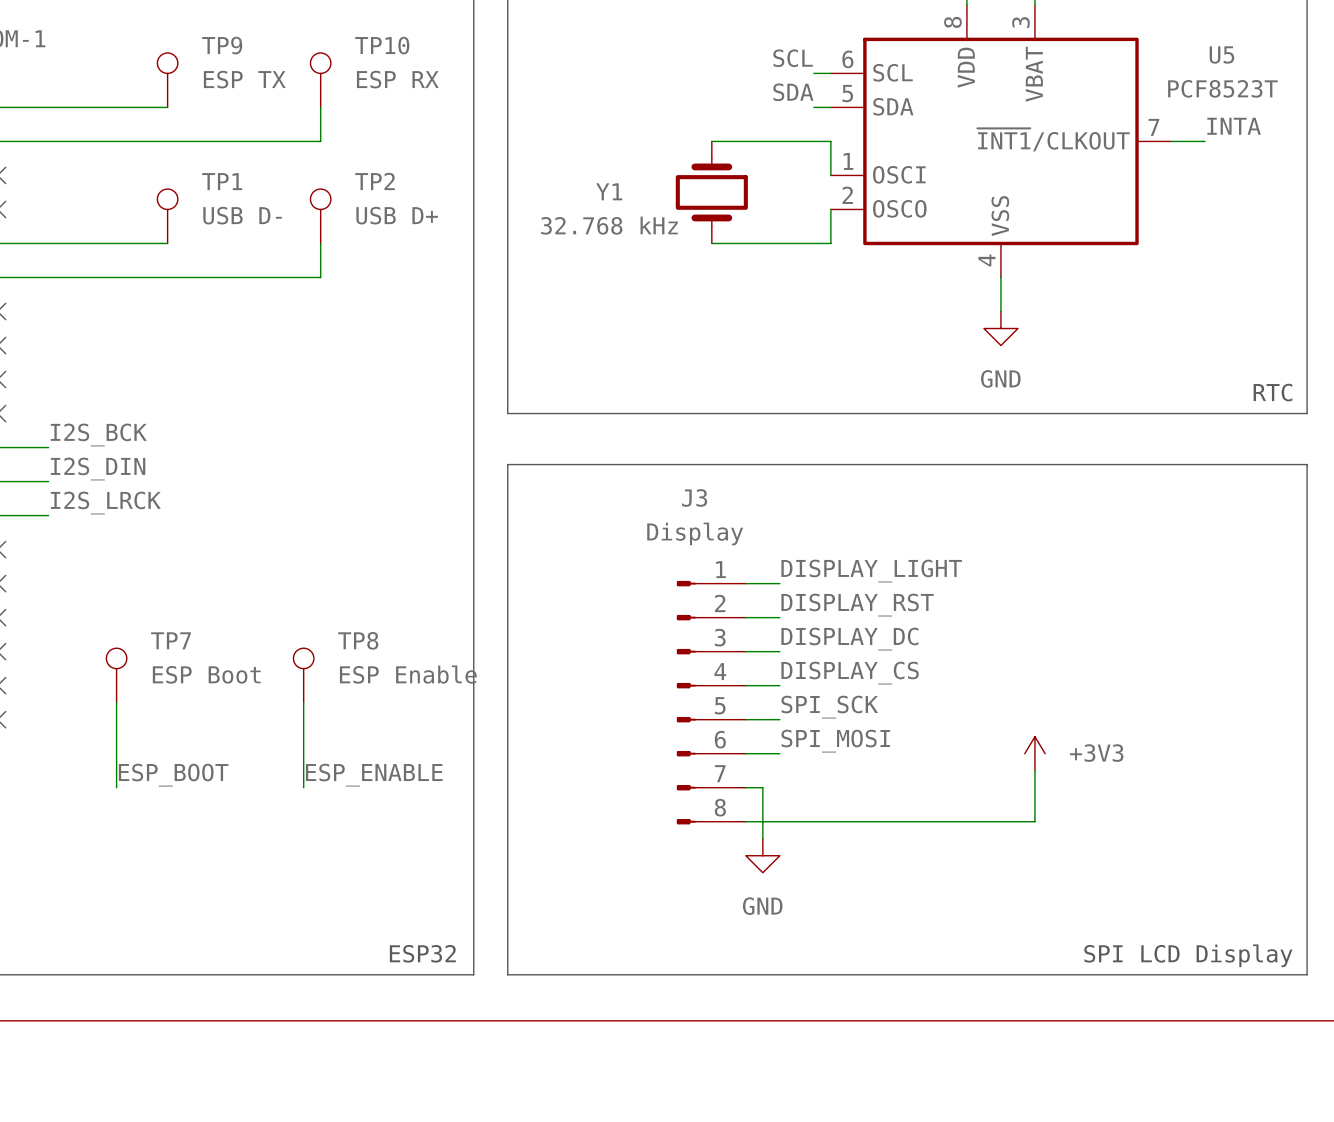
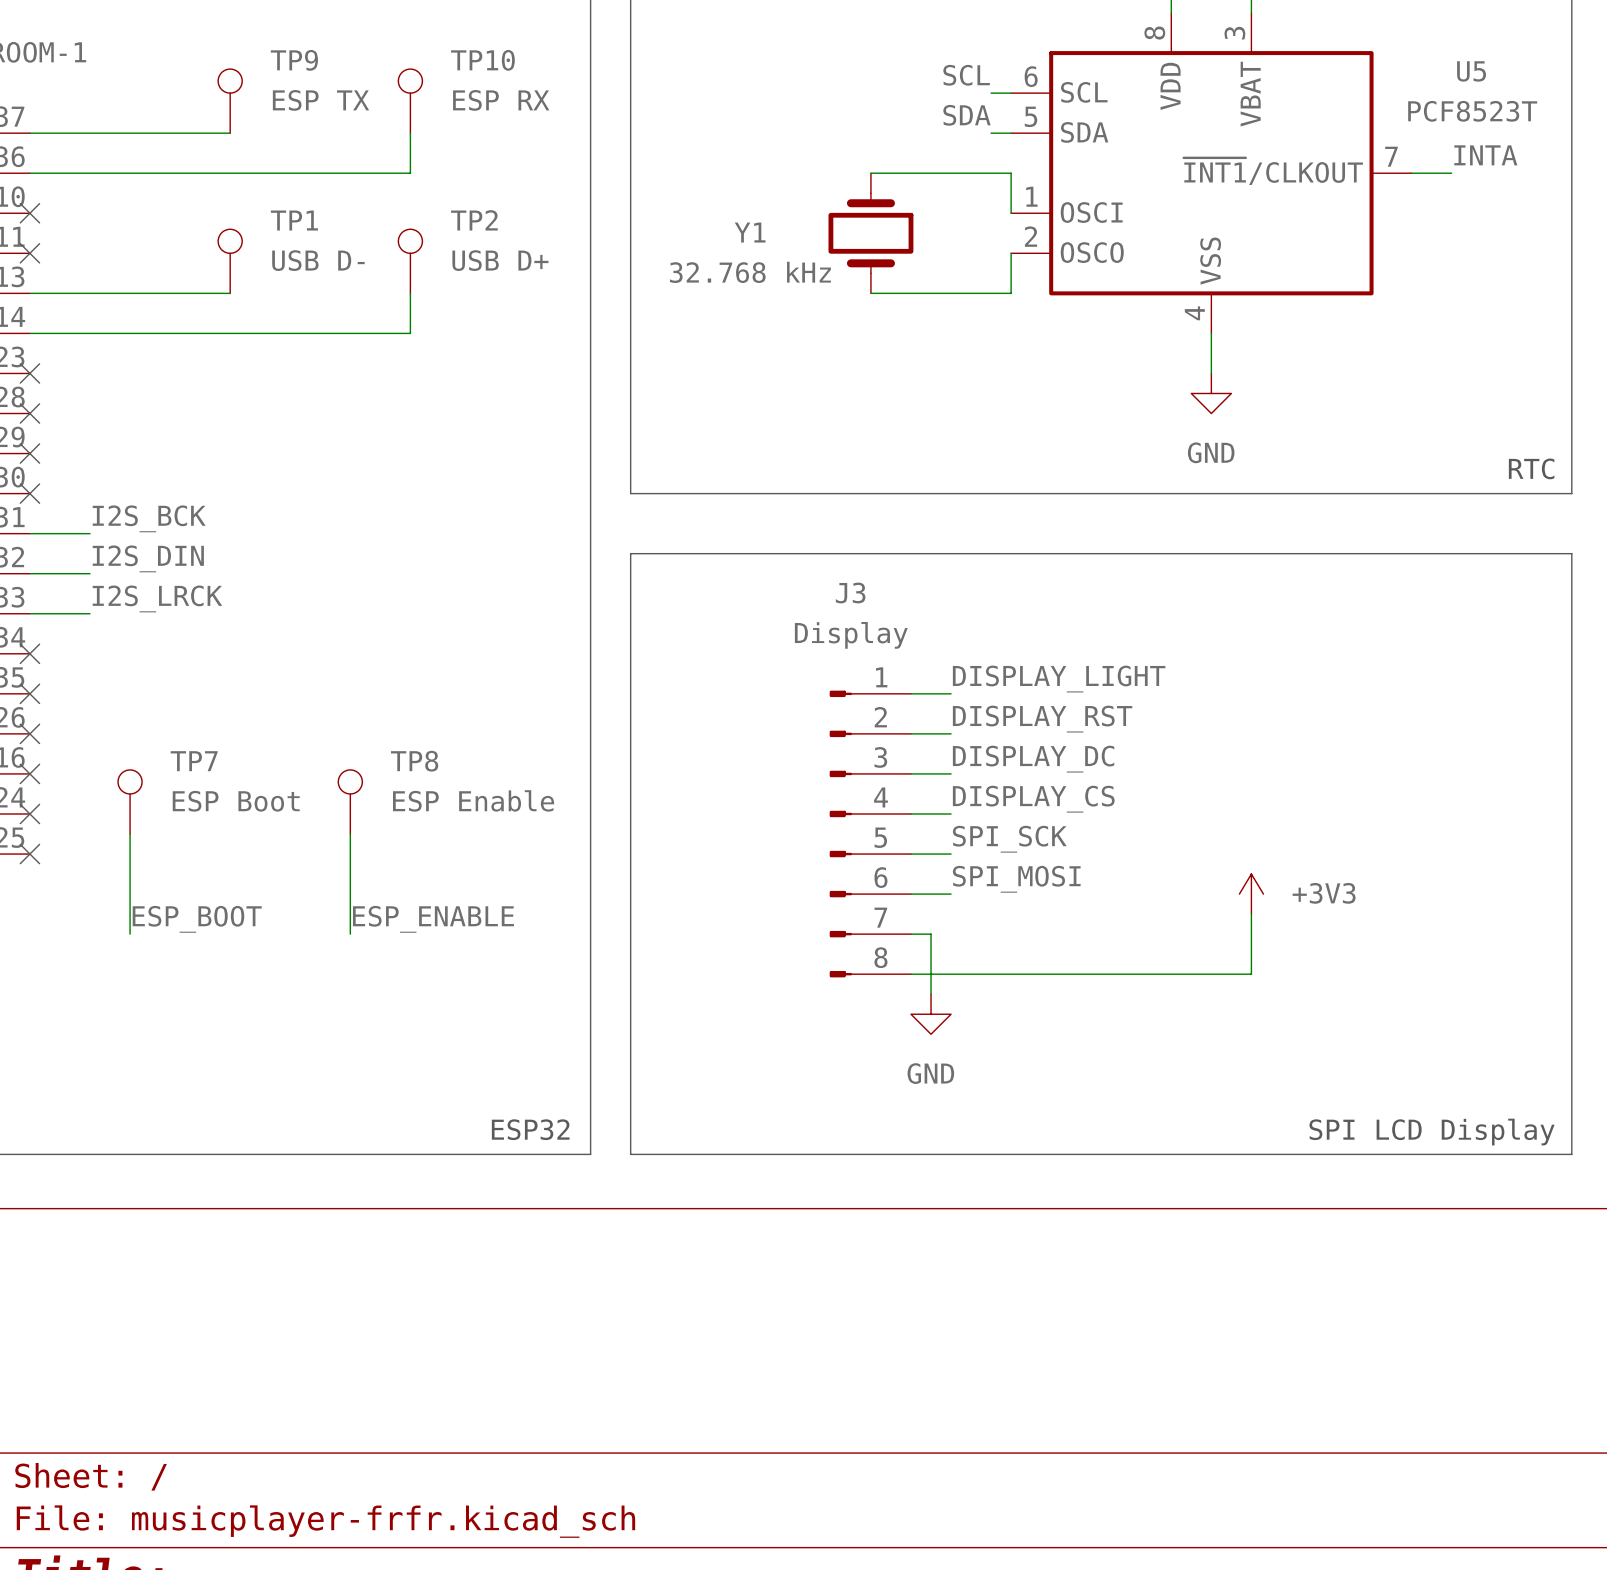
TP7 position: (116, 675) -> (130, 801)
TP8 position: (303, 675) -> (350, 801)
wire: (116, 702) (116, 787) -> (130, 834) (130, 934)
wire: (303, 702) (303, 787) -> (350, 834) (350, 934)
label position: ESP_BOOT (173, 775) -> ESP_BOOT (197, 919)
label position: ESP_ENABLE (374, 775) -> ESP_ENABLE (433, 919)

